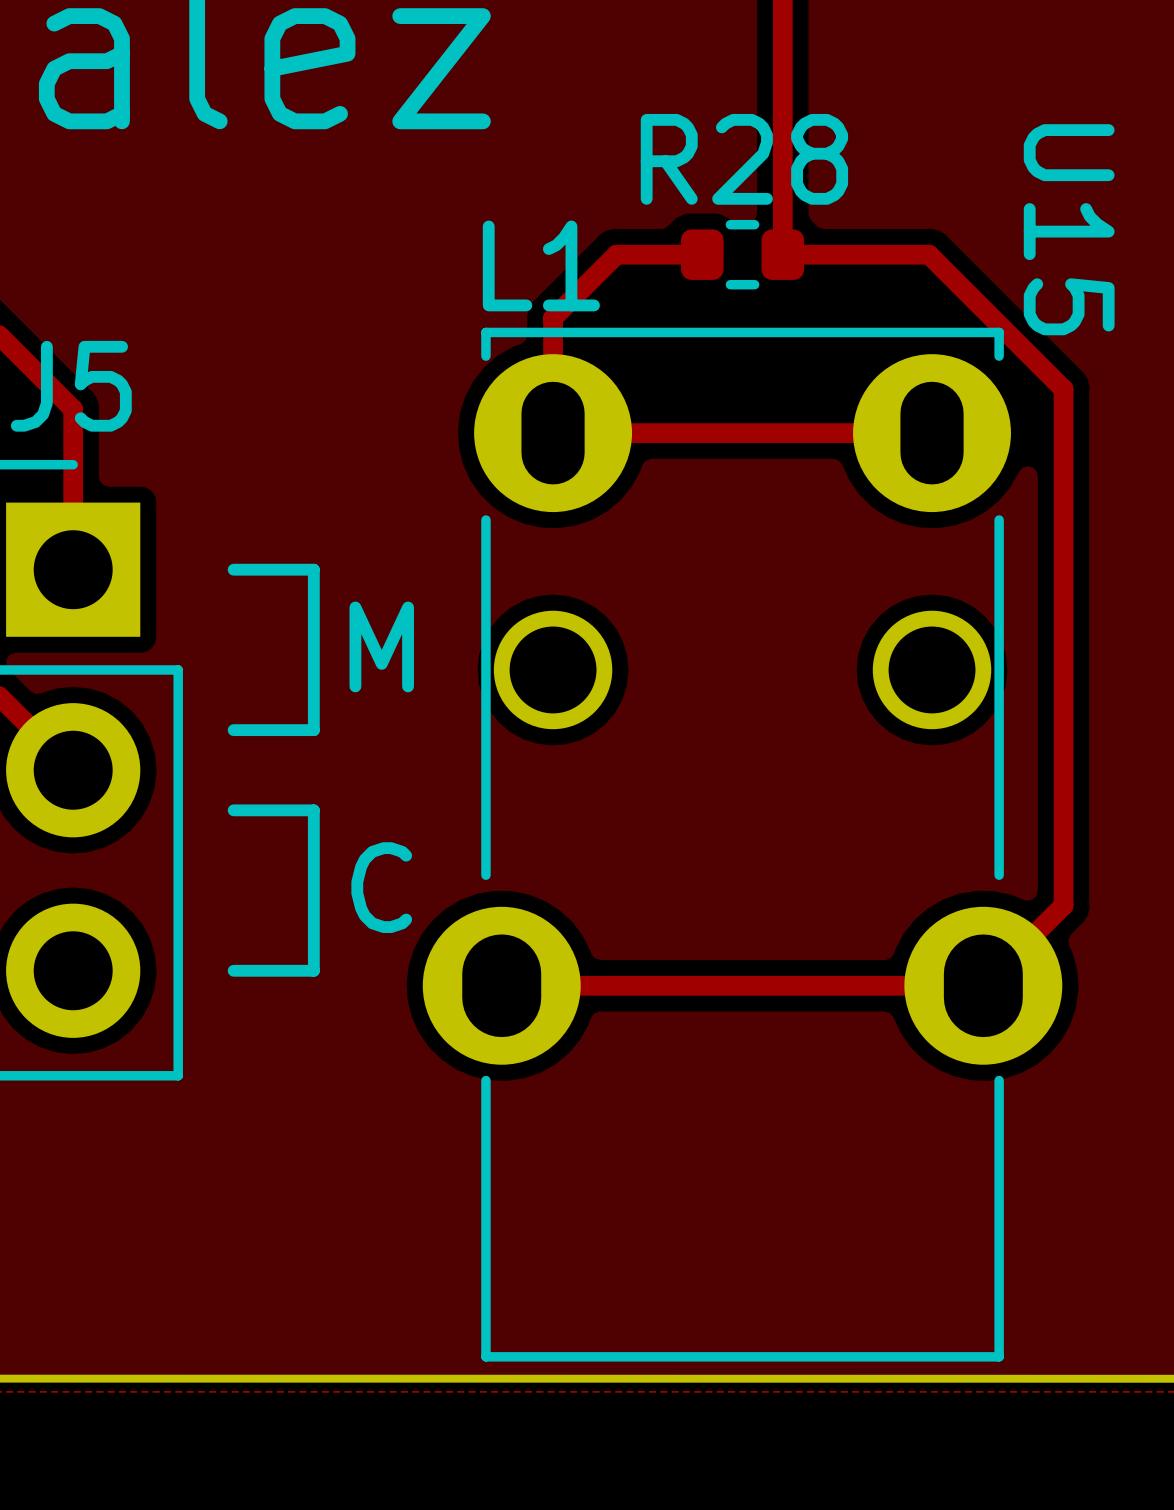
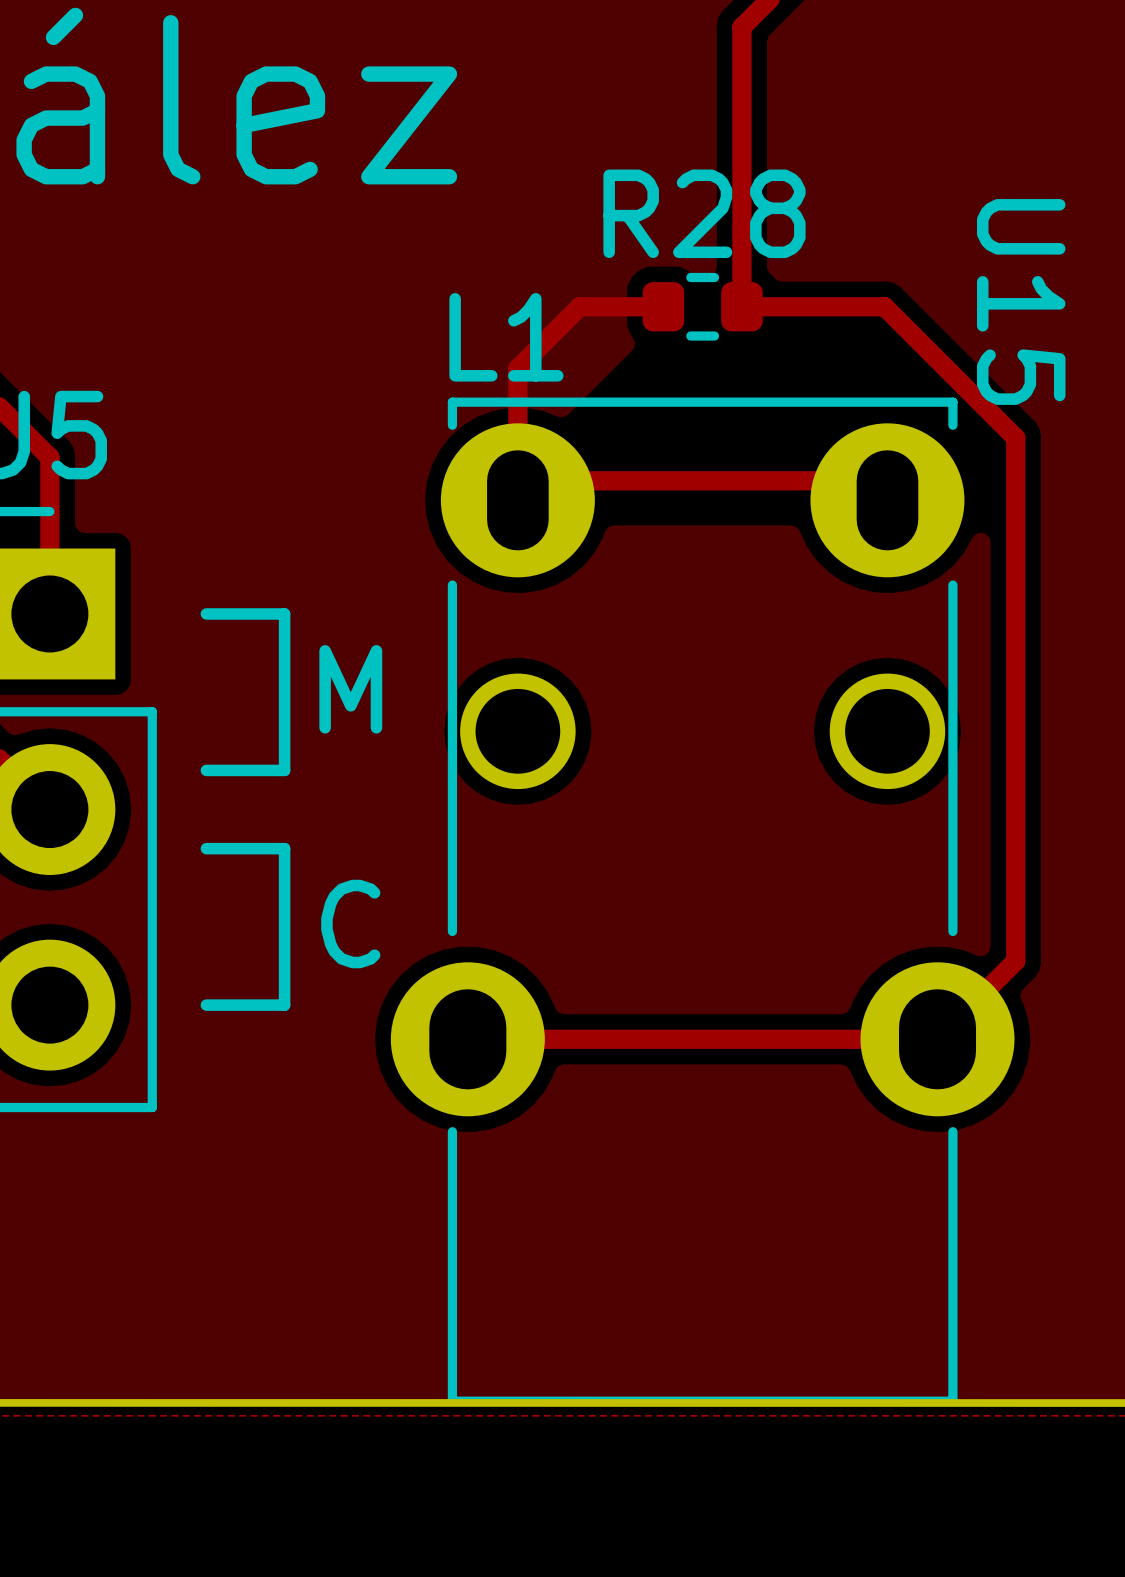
text position: L1 (541, 265) -> L1 (506, 337)
U15 position: (742, 844) -> (702, 901)
track: (1063, 905) (983, 985) (501, 985) -> (1015, 941) (1015, 961) (937, 1039) (467, 1039)

